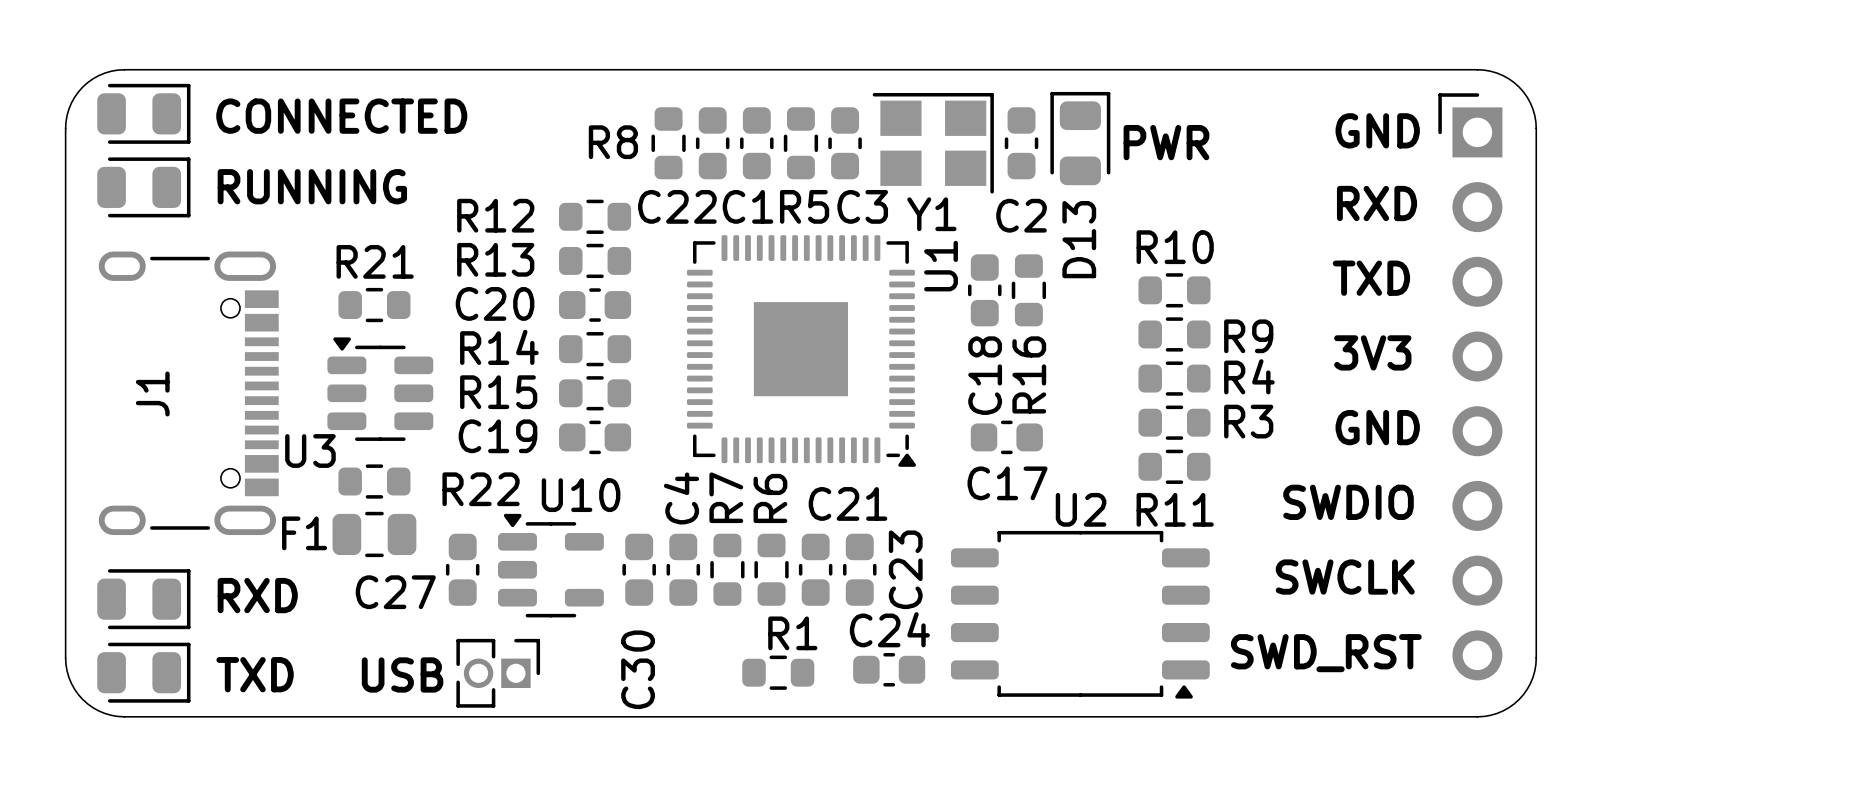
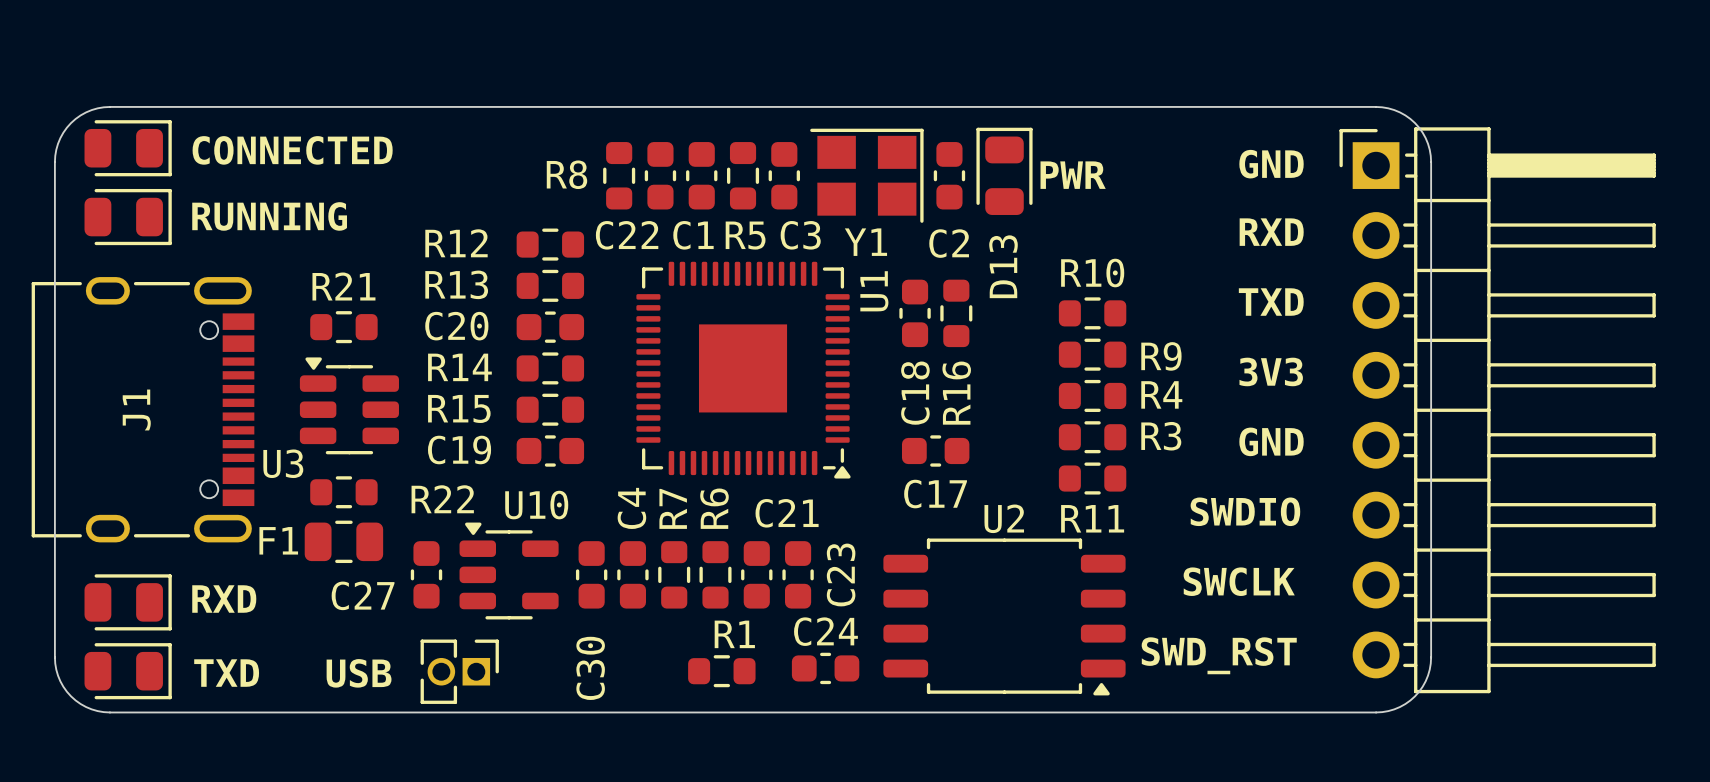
J1 footprint: [98, 251, 279, 536] -> [31, 277, 255, 543]
part: none -> (1497, 410)

